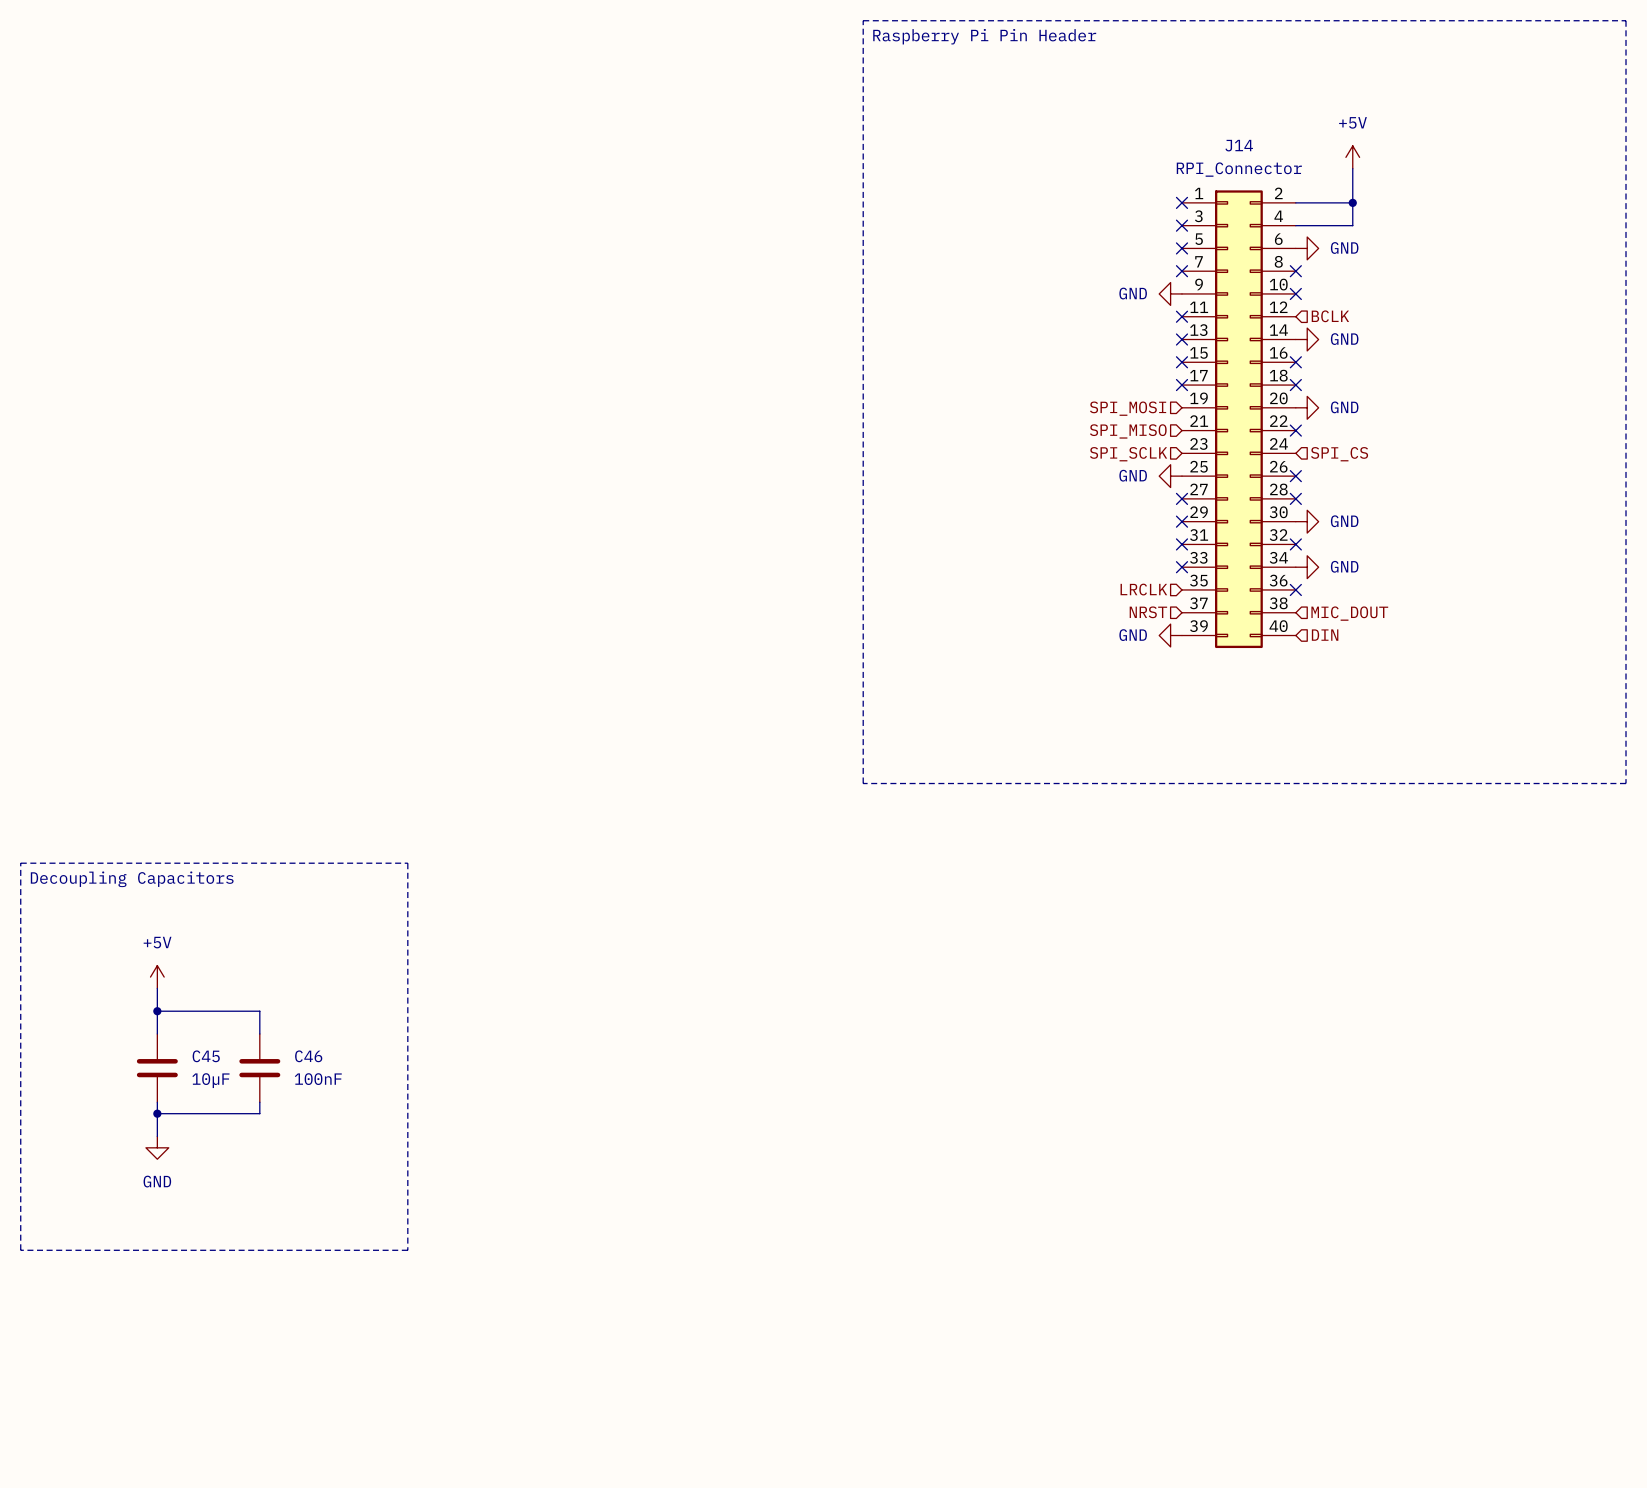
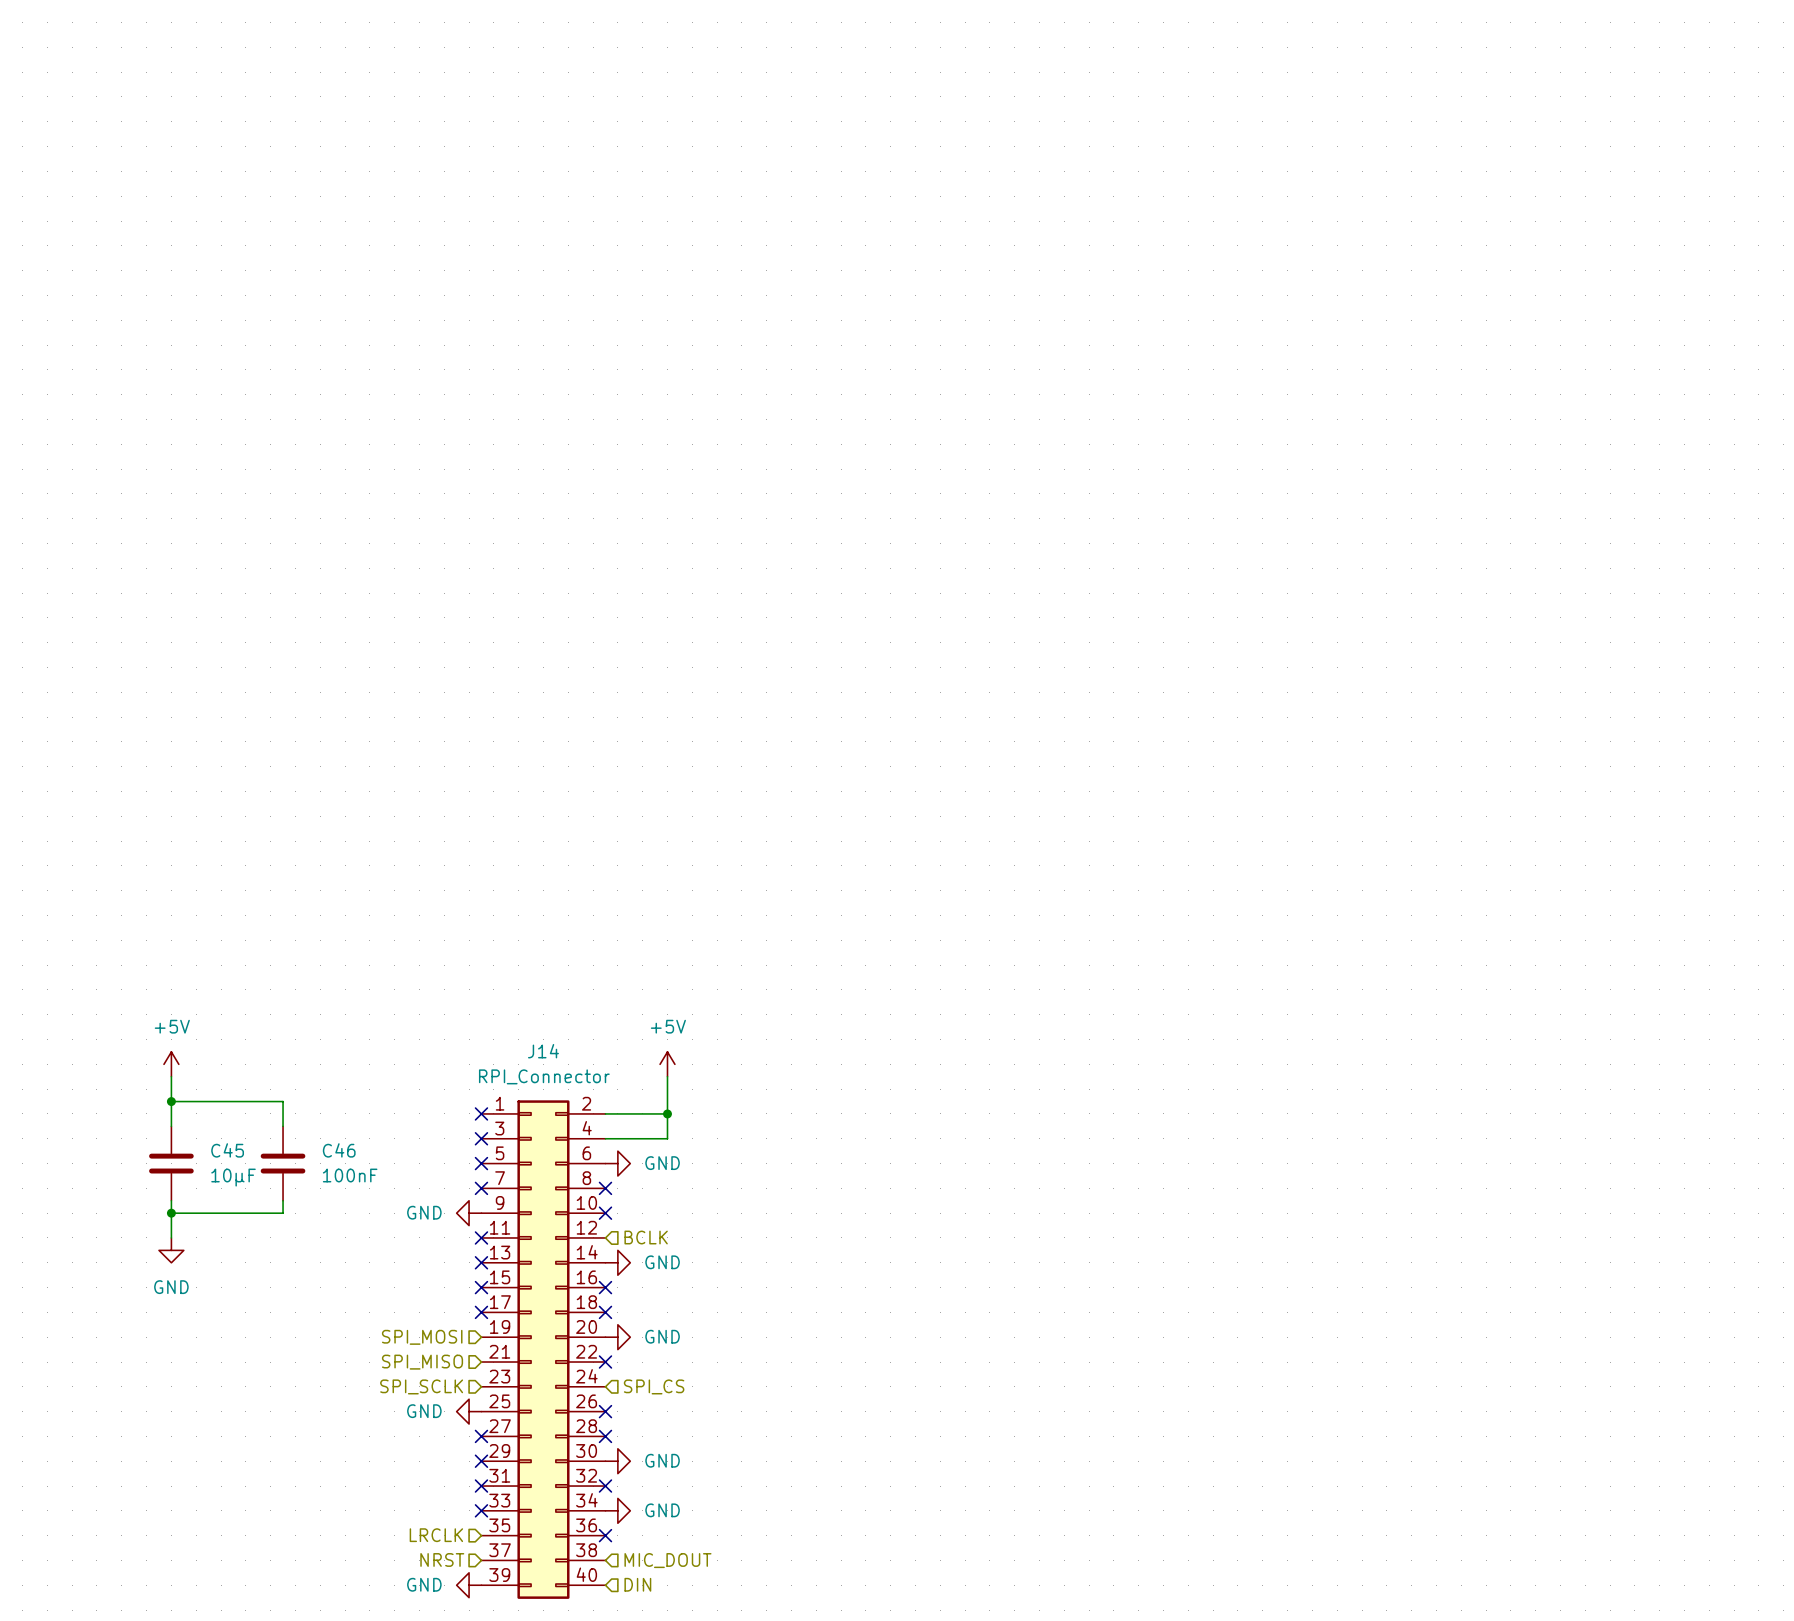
line: (863, 20) (1626, 20) (1626, 783) (863, 783) (863, 20) -> none
text: Raspberry Pi Pin Header (984, 36) -> none
power symbol: +5V (1352, 157) -> none
wire: (1352, 168) (1352, 225) (1295, 225) -> none
no-connect mark: (1181, 202) -> none
wire: (1295, 202) (1352, 202) -> none
junction: (1352, 202) -> none
no-connect mark: (1181, 225) -> none
no-connect mark: (1181, 248) -> none
power symbol: GND (1307, 248) -> none
no-connect mark: (1181, 271) -> none
no-connect mark: (1295, 271) -> none
power symbol: GND (1170, 293) -> none
no-connect mark: (1295, 293) -> none
no-connect mark: (1181, 316) -> none
hierarchical label: BCLK (1330, 316) -> none
no-connect mark: (1181, 339) -> none
power symbol: GND (1307, 339) -> none
no-connect mark: (1181, 362) -> none
no-connect mark: (1295, 362) -> none
no-connect mark: (1181, 385) -> none
no-connect mark: (1295, 385) -> none
power symbol: GND (1307, 407) -> none
hierarchical label: SPI_MOSI (1128, 408) -> none
J14 position: (1238, 419) -> (543, 1349)
no-connect mark: (1295, 430) -> none
hierarchical label: SPI_MISO (1128, 431) -> none
hierarchical label: SPI_SCLK (1128, 454) -> none
hierarchical label: SPI_CS (1339, 454) -> none
power symbol: GND (1170, 476) -> none
no-connect mark: (1295, 476) -> none
no-connect mark: (1181, 498) -> none
no-connect mark: (1295, 498) -> none
no-connect mark: (1181, 521) -> none
power symbol: GND (1307, 521) -> none
no-connect mark: (1181, 544) -> none
no-connect mark: (1295, 544) -> none
no-connect mark: (1181, 567) -> none
power symbol: GND (1307, 567) -> none
hierarchical label: LRCLK (1143, 589) -> none
no-connect mark: (1295, 589) -> none
hierarchical label: NRST (1148, 612) -> none
hierarchical label: MIC_DOUT (1349, 613) -> none
power symbol: GND (1170, 635) -> none
hierarchical label: DIN (1325, 635) -> none
line: (20, 863) (407, 863) (407, 1250) (20, 1250) (20, 863) -> none
text: Decoupling Capacitors (132, 879) -> none
power symbol: none -> +5V (667, 1064)
wire: none -> (667, 1076) (667, 1138) (605, 1138)
no-connect mark: none -> (481, 1113)
wire: none -> (605, 1113) (667, 1113)
junction: none -> (667, 1113)
no-connect mark: none -> (481, 1138)
no-connect mark: none -> (481, 1163)
power symbol: none -> GND (617, 1163)
no-connect mark: none -> (481, 1188)
no-connect mark: none -> (605, 1188)
power symbol: none -> GND (469, 1213)
no-connect mark: none -> (605, 1213)
no-connect mark: none -> (481, 1237)
hierarchical label: none -> BCLK (646, 1237)
no-connect mark: none -> (481, 1262)
power symbol: none -> GND (617, 1262)
no-connect mark: none -> (481, 1287)
no-connect mark: none -> (605, 1287)
no-connect mark: none -> (481, 1312)
no-connect mark: none -> (605, 1312)
power symbol: none -> GND (617, 1337)
hierarchical label: none -> SPI_MOSI (422, 1337)
no-connect mark: none -> (605, 1362)
hierarchical label: none -> SPI_MISO (422, 1362)
hierarchical label: none -> SPI_SCLK (421, 1386)
hierarchical label: none -> SPI_CS (654, 1386)
power symbol: none -> GND (469, 1411)
no-connect mark: none -> (605, 1411)
no-connect mark: none -> (481, 1436)
no-connect mark: none -> (605, 1436)
no-connect mark: none -> (481, 1461)
power symbol: none -> GND (617, 1461)
no-connect mark: none -> (481, 1486)
no-connect mark: none -> (605, 1486)
no-connect mark: none -> (481, 1510)
power symbol: none -> GND (617, 1510)
hierarchical label: none -> LRCLK (436, 1535)
no-connect mark: none -> (605, 1535)
hierarchical label: none -> NRST (442, 1559)
hierarchical label: none -> MIC_DOUT (667, 1560)
hierarchical label: none -> DIN (637, 1584)
power symbol: none -> GND (469, 1585)

